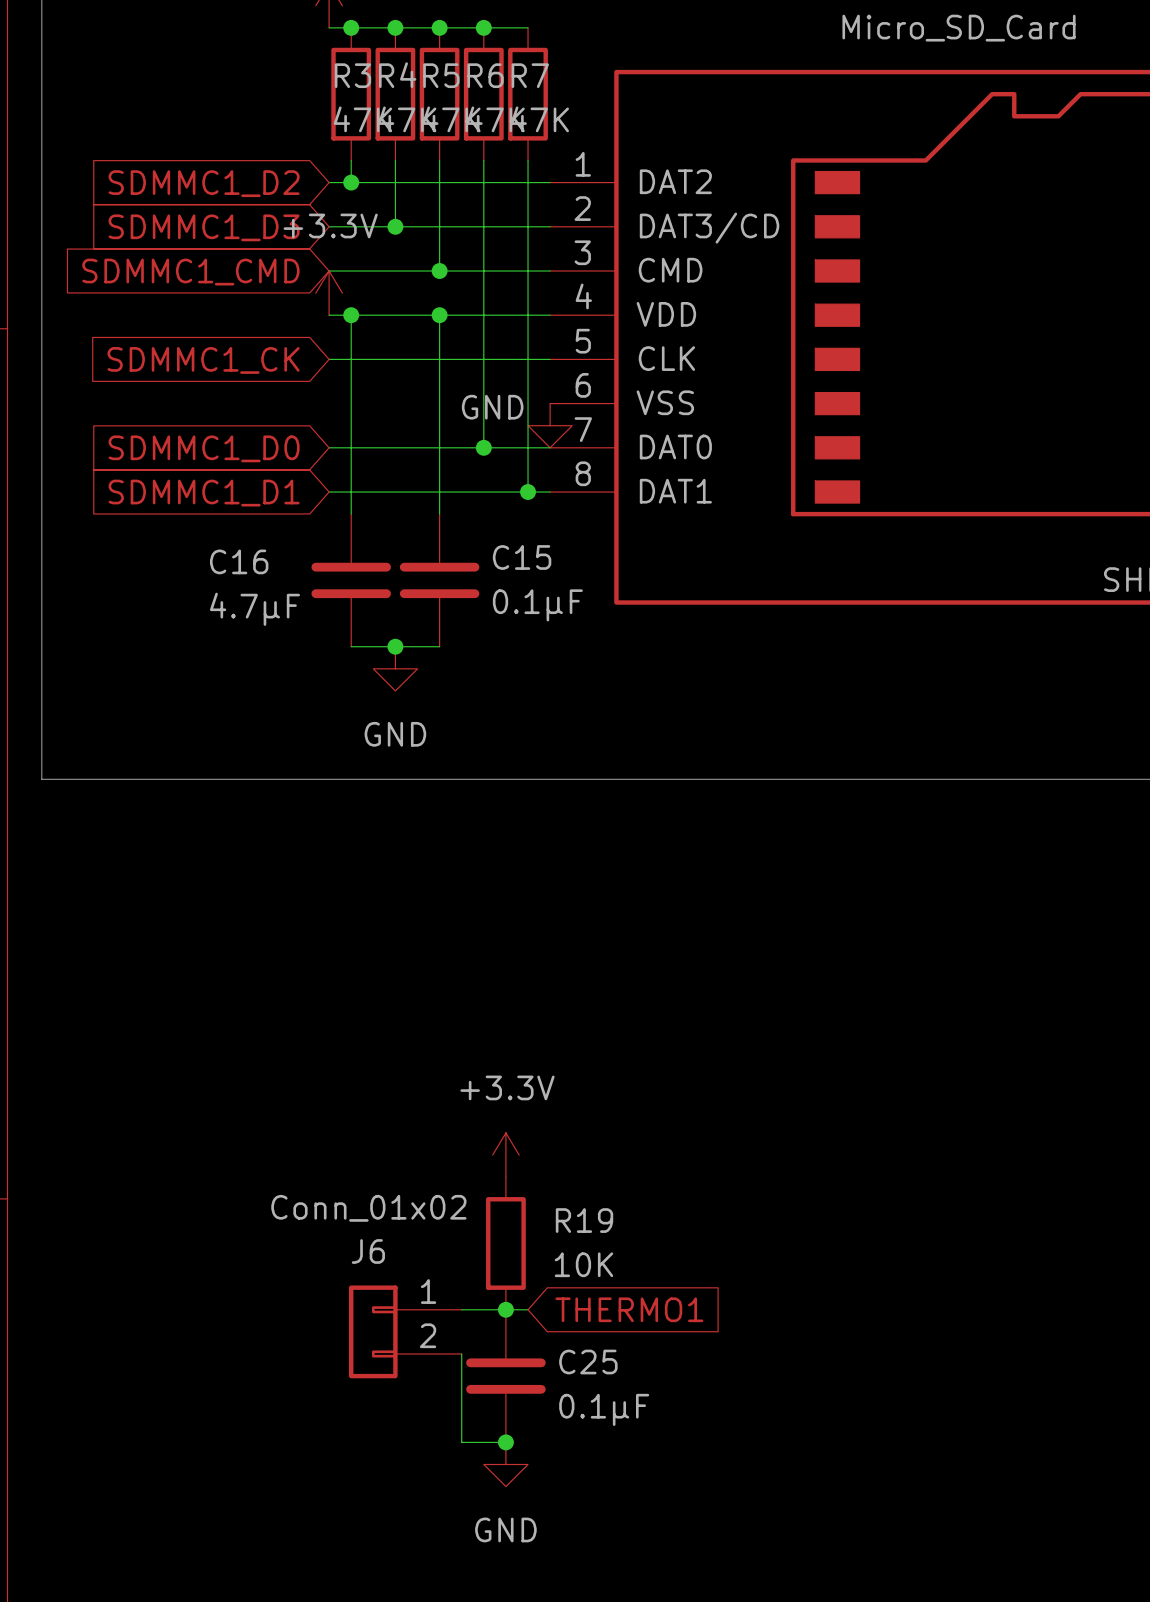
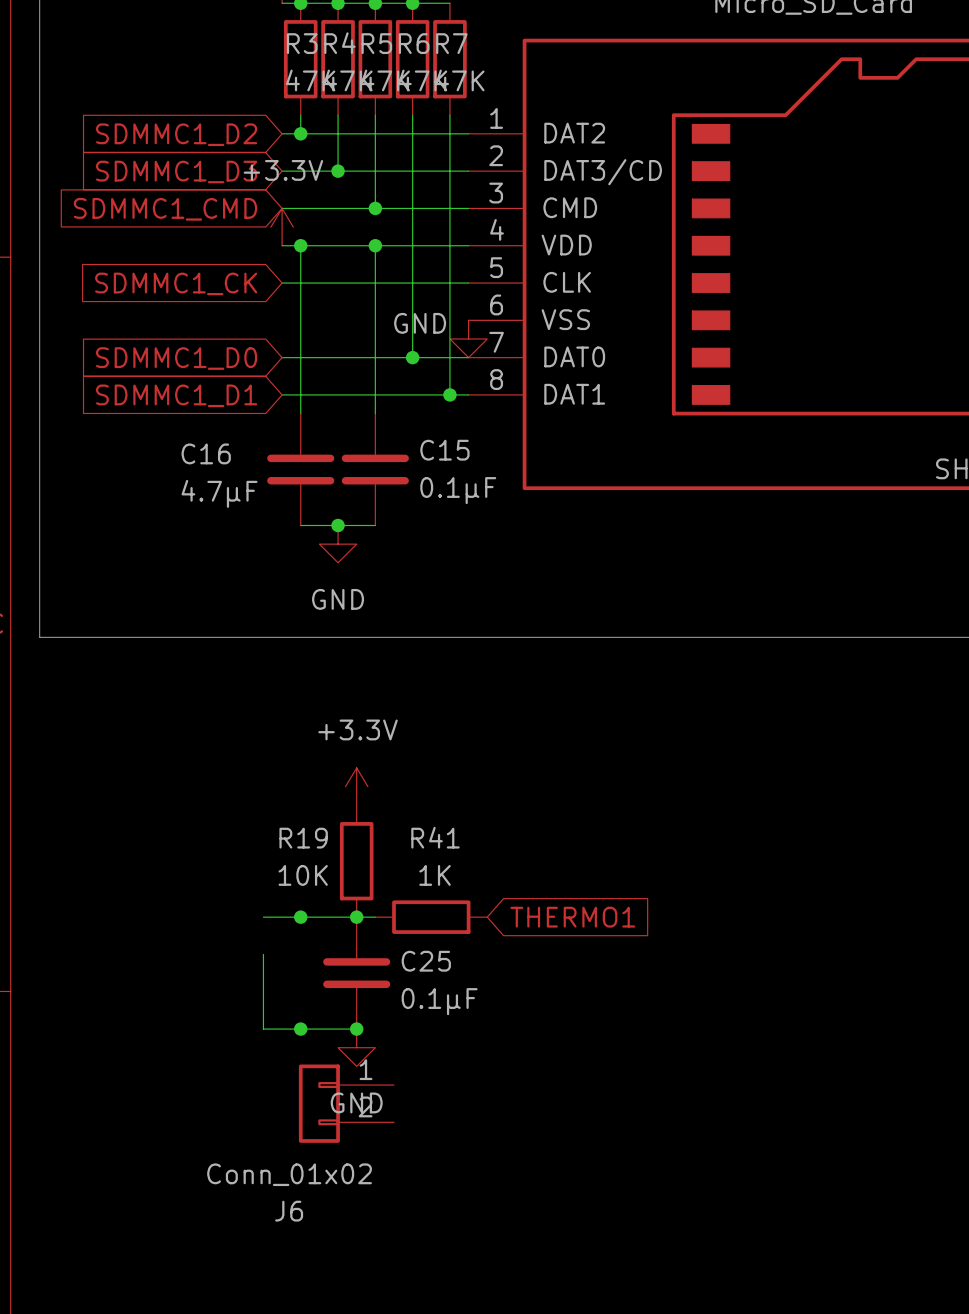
wire: none -> (263, 917) (375, 917)
junction: none -> (300, 917)
junction: none -> (356, 917)
R41: none -> 1K (431, 917)
wire: none -> (263, 954) (263, 1029) (356, 1029)
power symbol position: +3.3V (505, 1155) -> +3.3V (356, 786)
J6 value position: Conn_01x02 (368, 1208) -> Conn_01x02 (289, 1174)
R19 name position: R19 (584, 1220) -> R19 (303, 838)
junction: none -> (300, 1029)
junction: none -> (356, 1029)
R19 position: (505, 1243) -> (356, 861)
J6 name position: J6 (368, 1251) -> J6 (289, 1211)
R19 value position: 10K (583, 1264) -> 10K (303, 875)
wire: (461, 1309) (528, 1309) -> none
junction: (505, 1309) -> none
global label position: THERMO1 (629, 1309) -> THERMO1 (572, 917)
wire: (461, 1353) (461, 1442) (505, 1442) -> none
C25 position: (505, 1376) -> (356, 973)
junction: (505, 1442) -> none
power symbol position: GND (505, 1464) -> GND (356, 1047)

